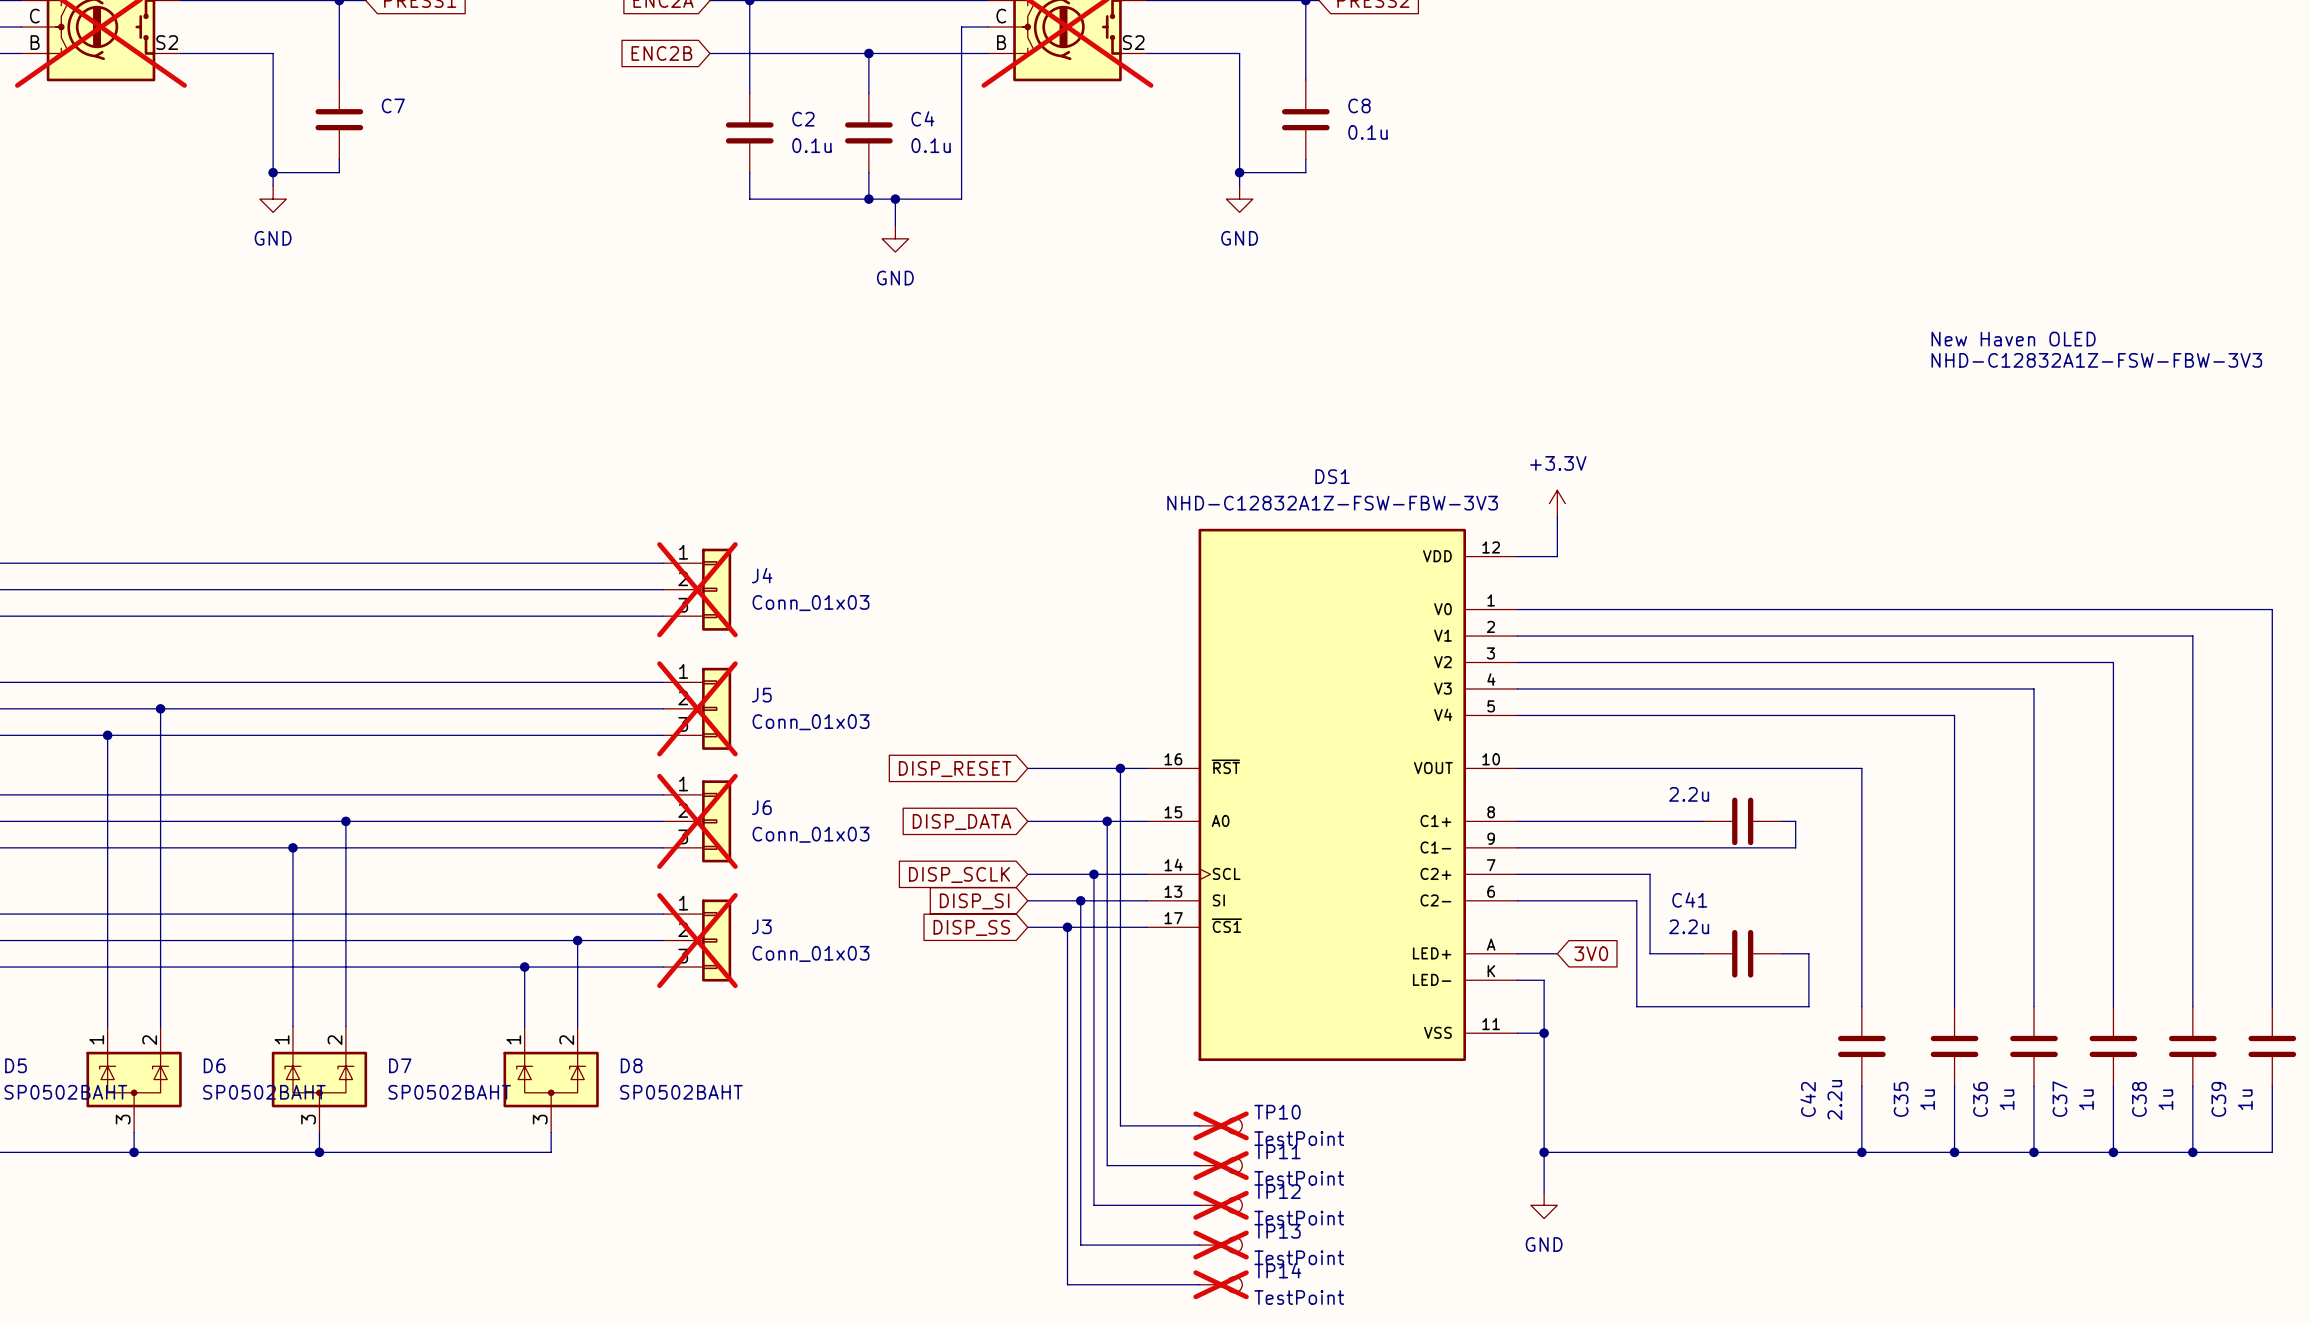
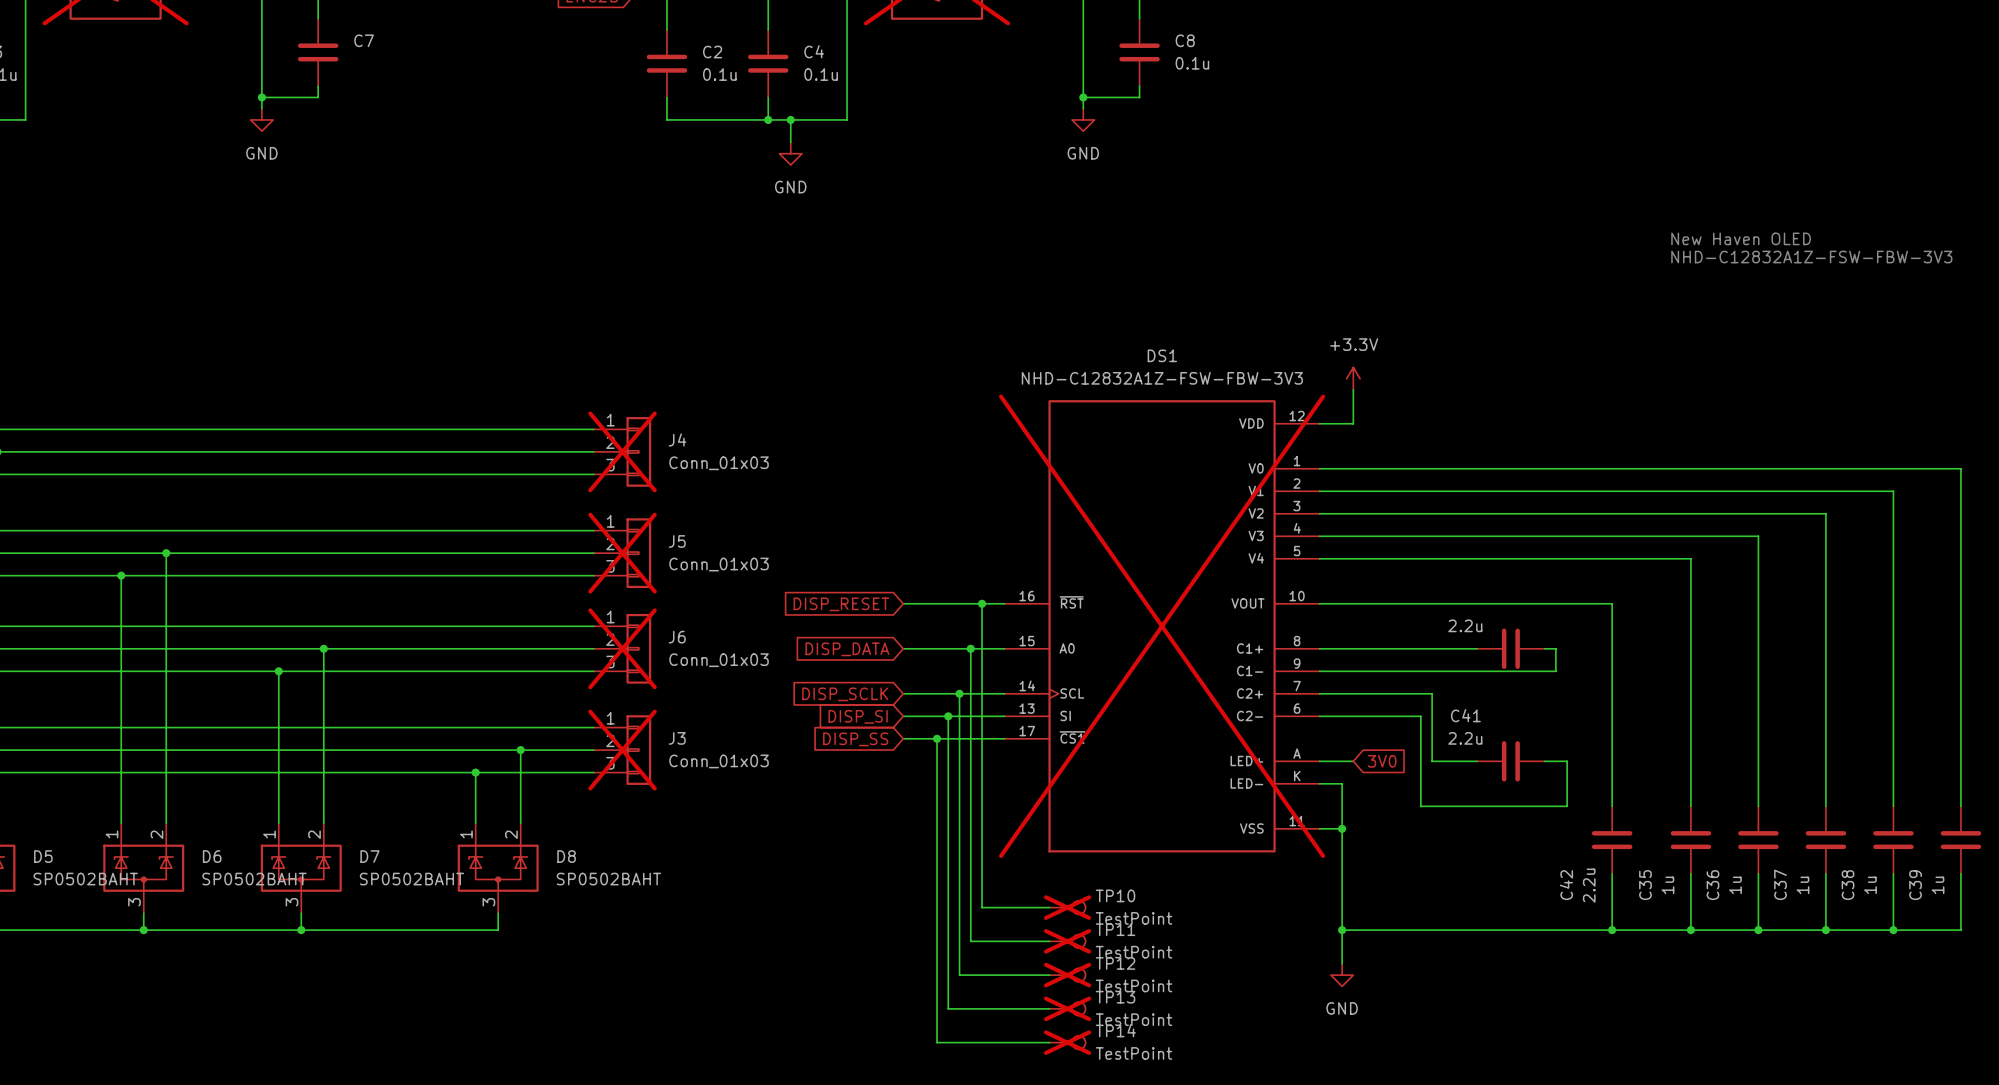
DS1 do-not-place cross: none -> (1162, 626)

